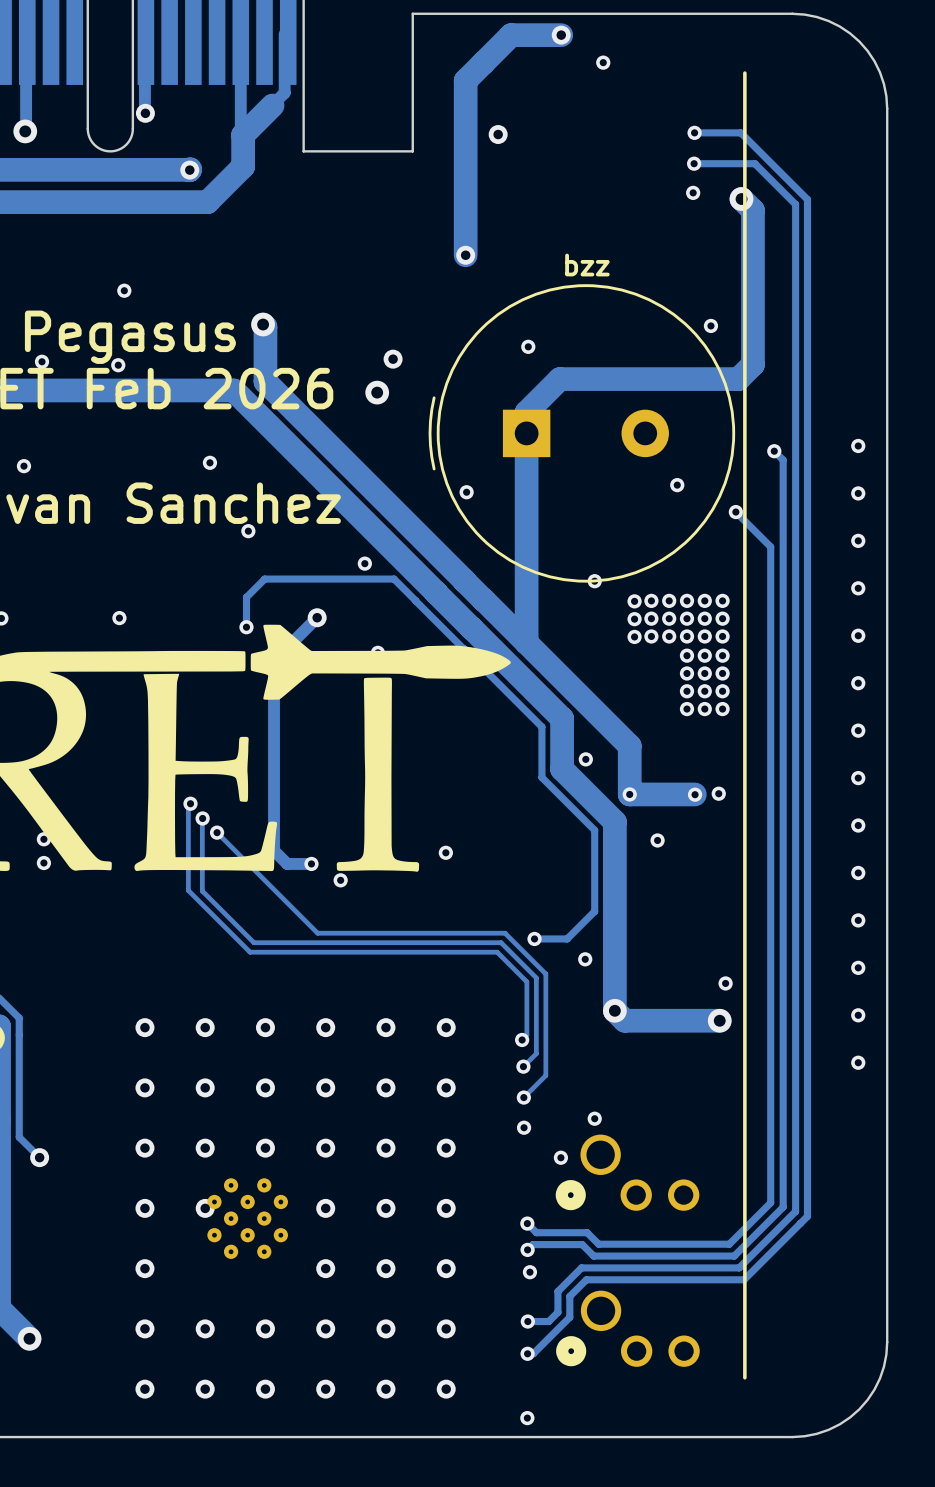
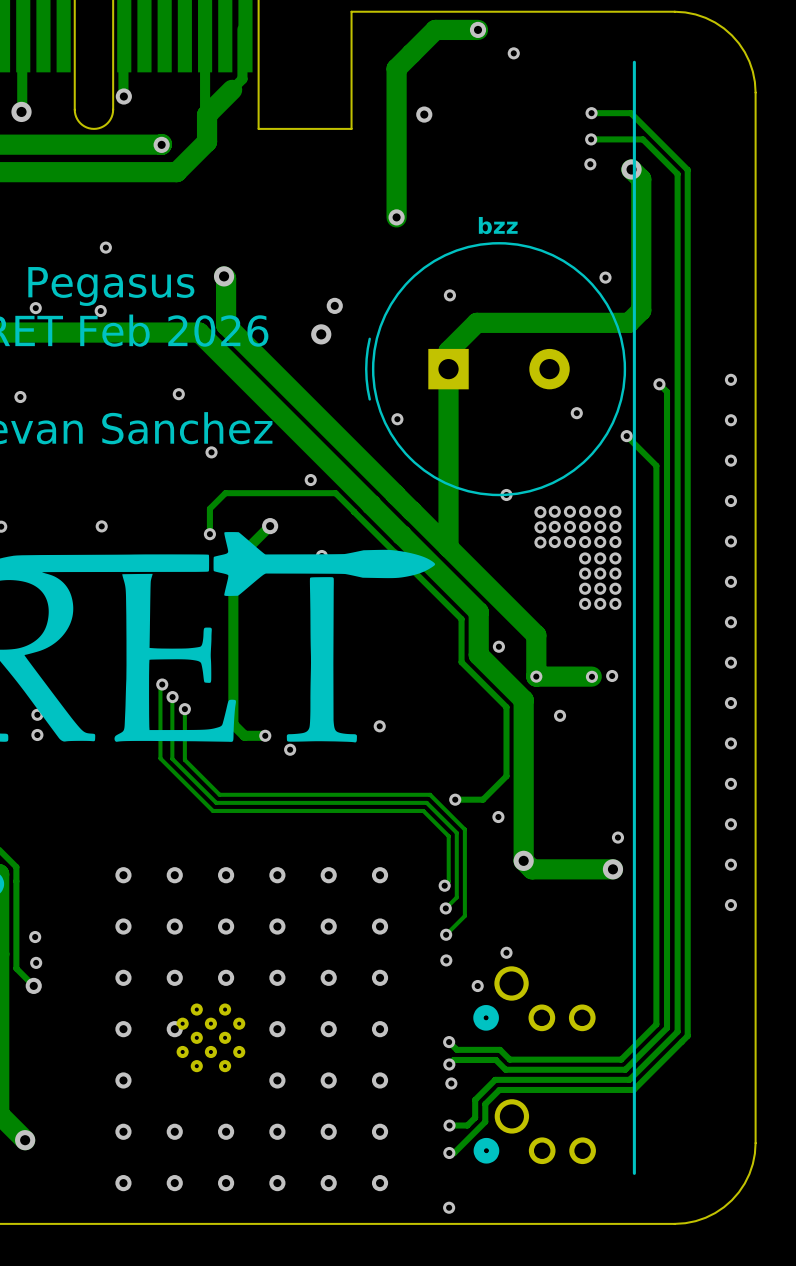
track: (217, 832) (317, 933) -> (184, 709) (184, 760) (219, 794) (270, 794)
via: none -> (35, 937)
via: none -> (36, 962)

